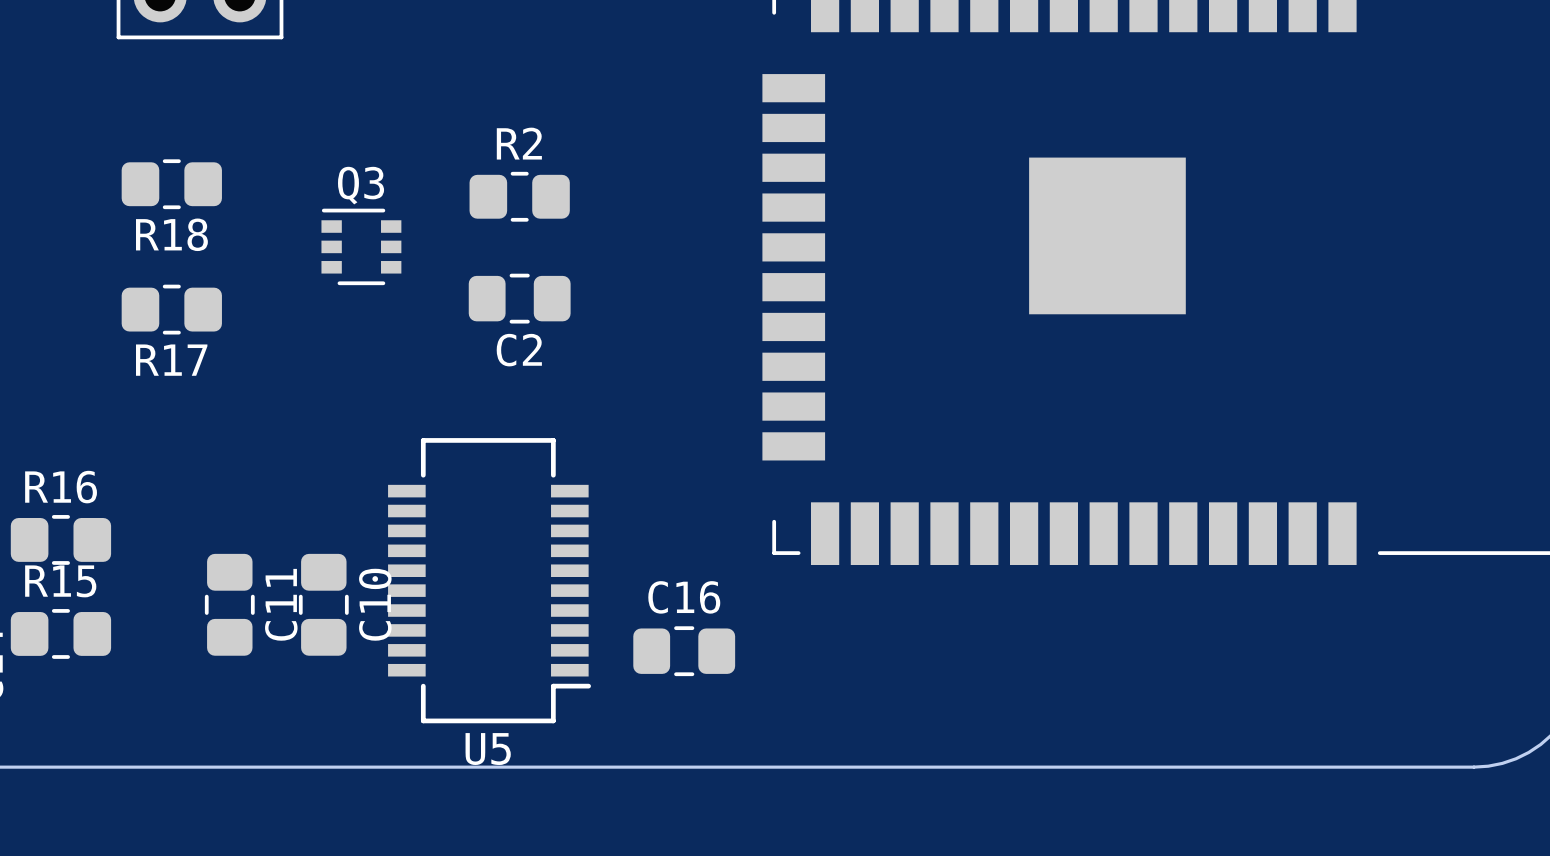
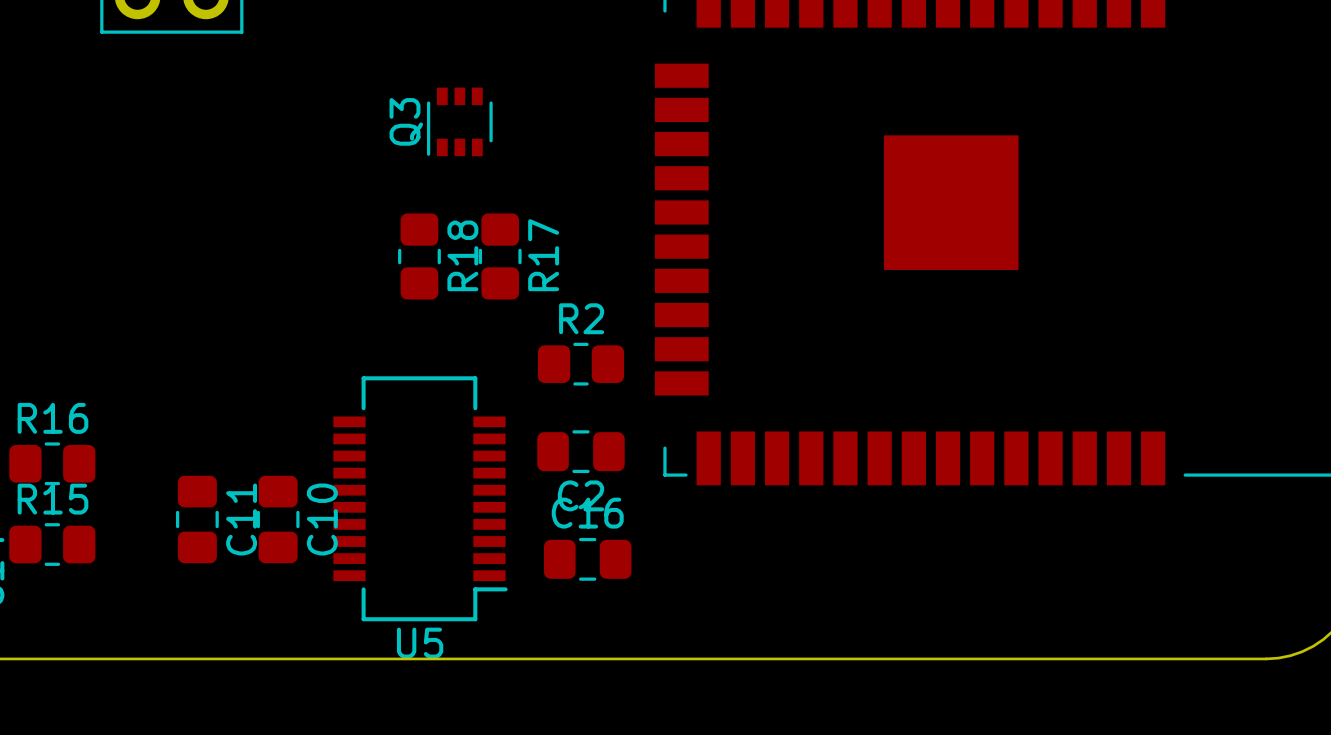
R18 rotation: 0° (171, 184) -> 90° clockwise (419, 256)
R18 position: (171, 184) -> (419, 256)
R2 position: (519, 196) -> (580, 364)
R18 name position: R18 (171, 234) -> R18 (462, 255)
Q3 rotation: 0° (361, 246) -> 90° counterclockwise (459, 121)
Q3 position: (361, 246) -> (459, 121)
C2 position: (519, 298) -> (580, 451)
R17 rotation: 0° (171, 309) -> 90° clockwise (500, 256)
R17 position: (171, 309) -> (500, 256)
R17 name position: R17 (171, 360) -> R17 (543, 255)

